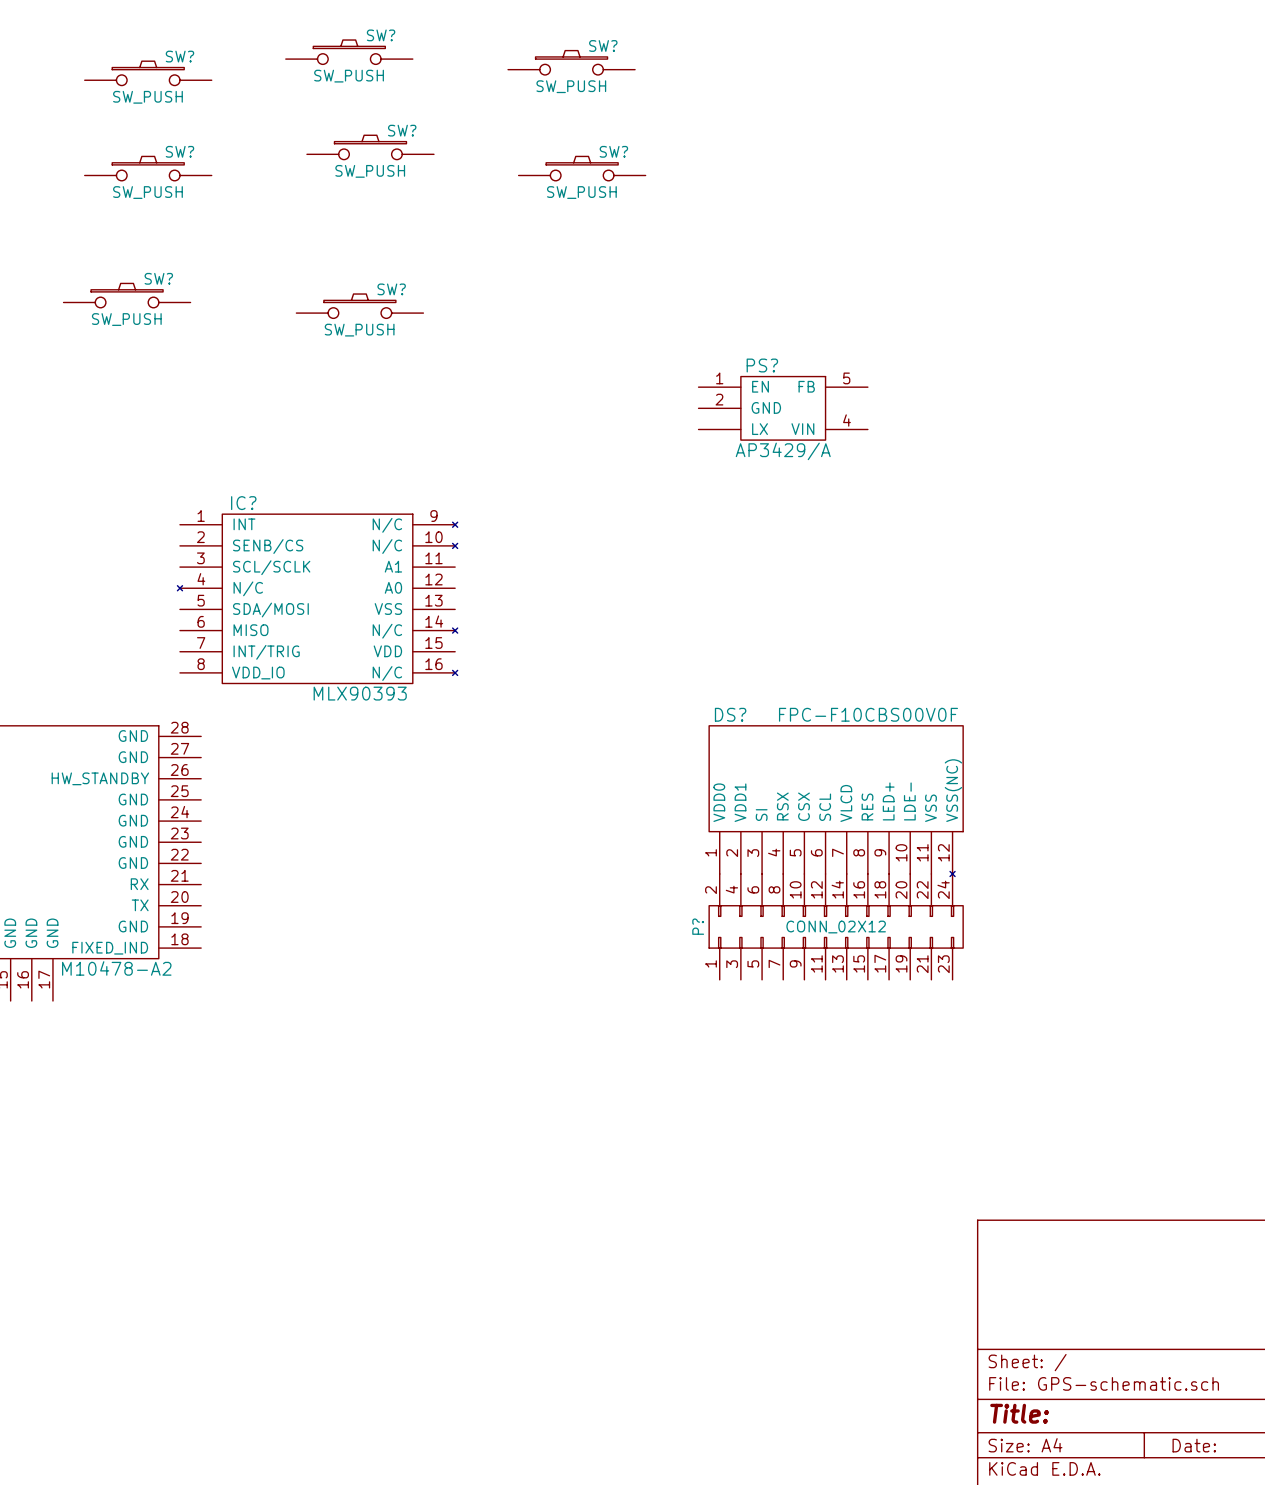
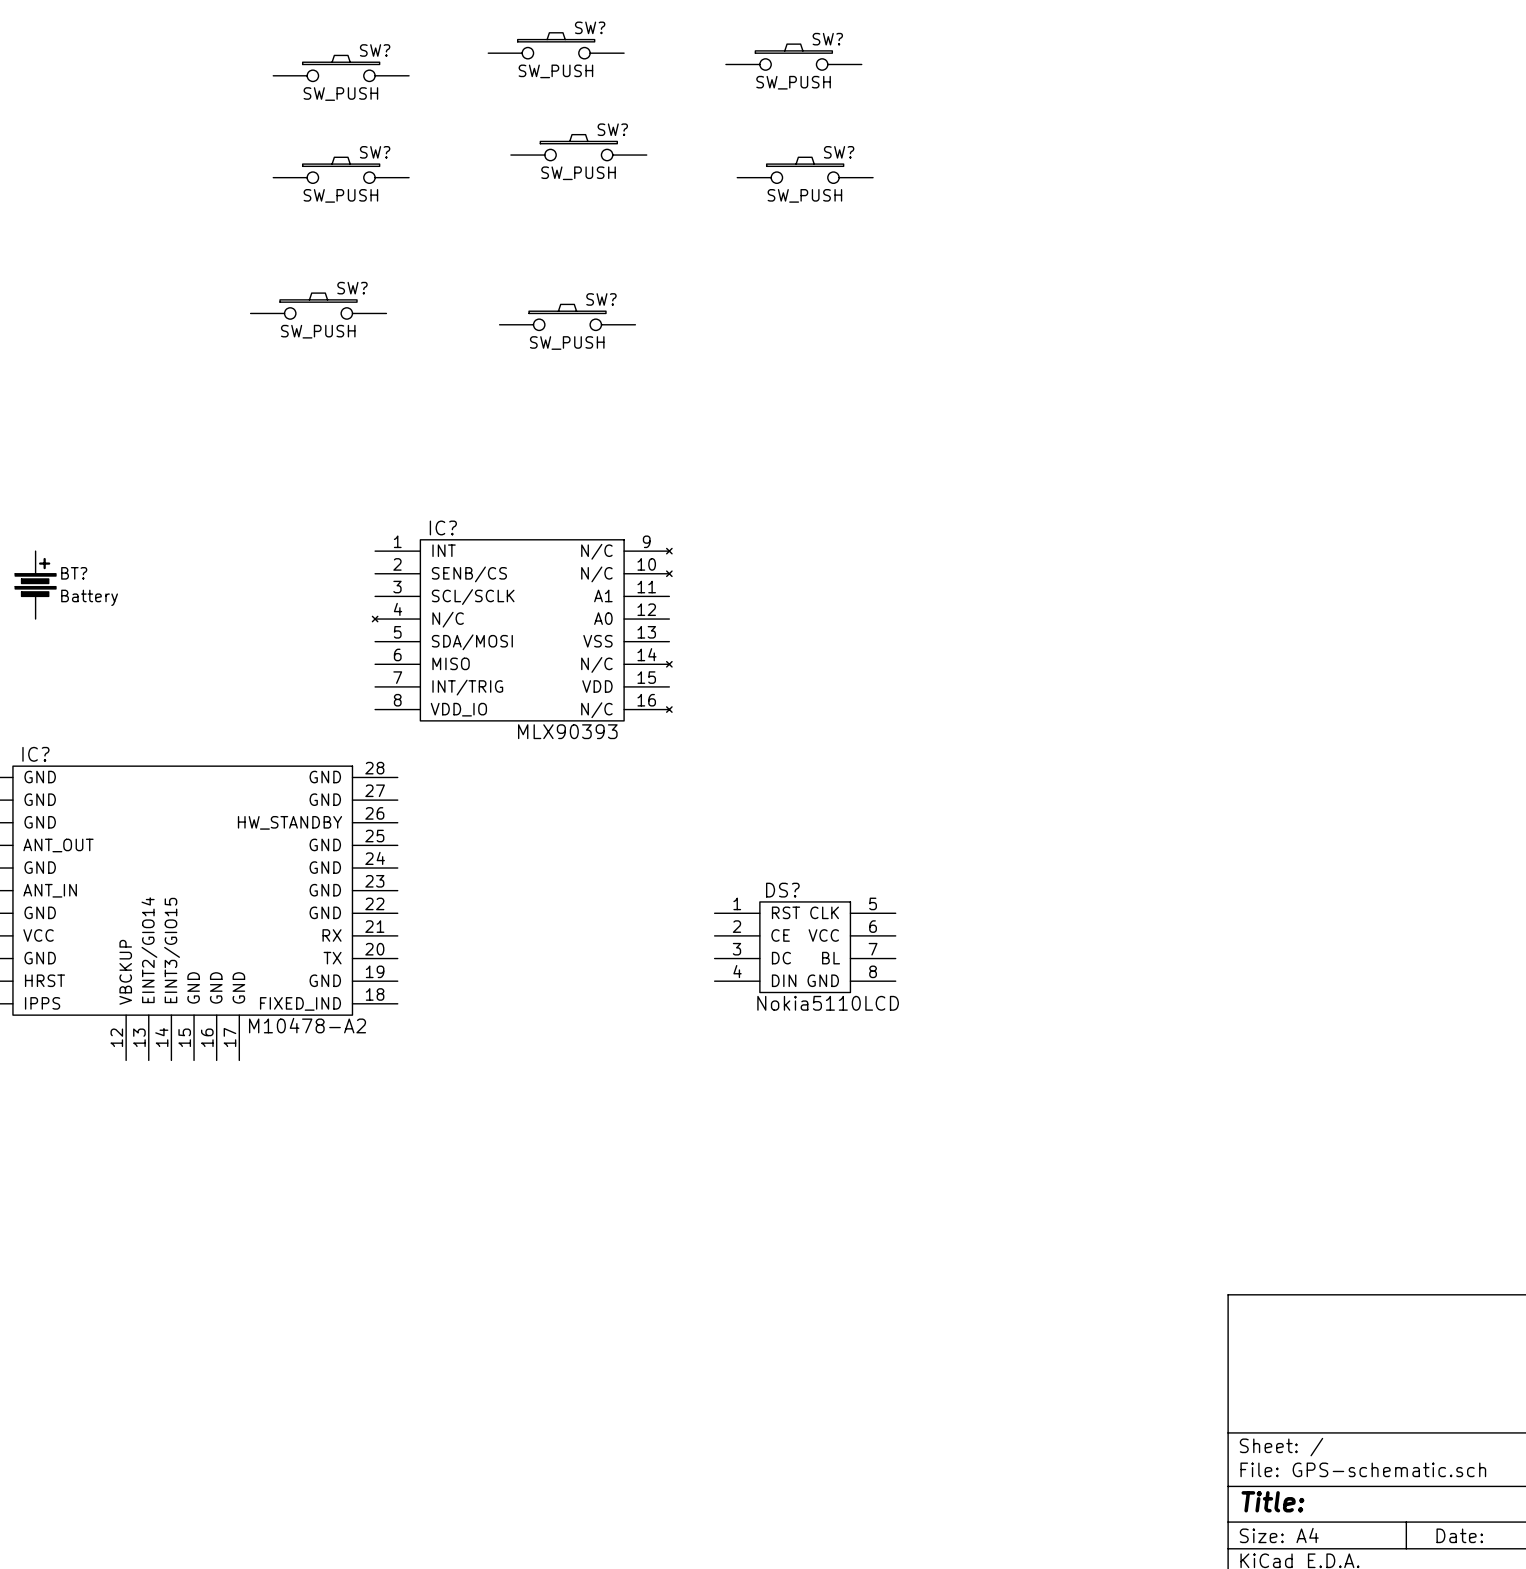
PS?: AP3429/A (783, 408) -> none
DS?: FPC-F10CBS00V0F (836, 801) -> none
DS?: none -> Nokia5110LCD (805, 947)
P?: CONN_02X12 (836, 926) -> none

